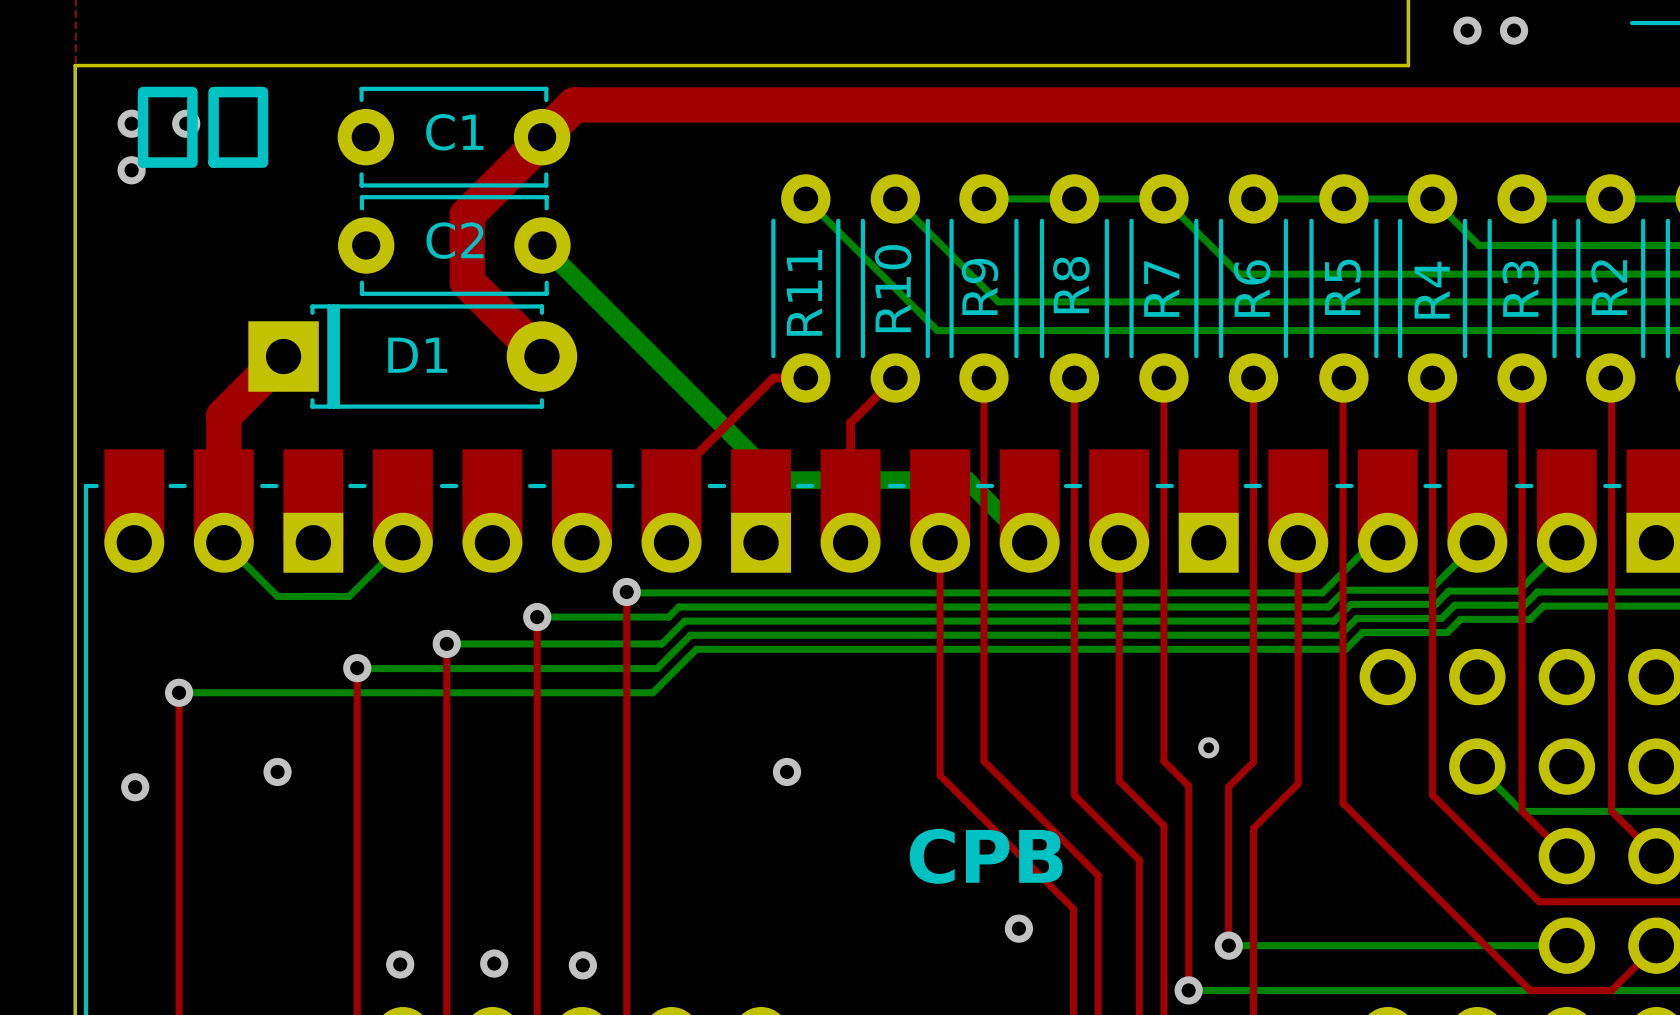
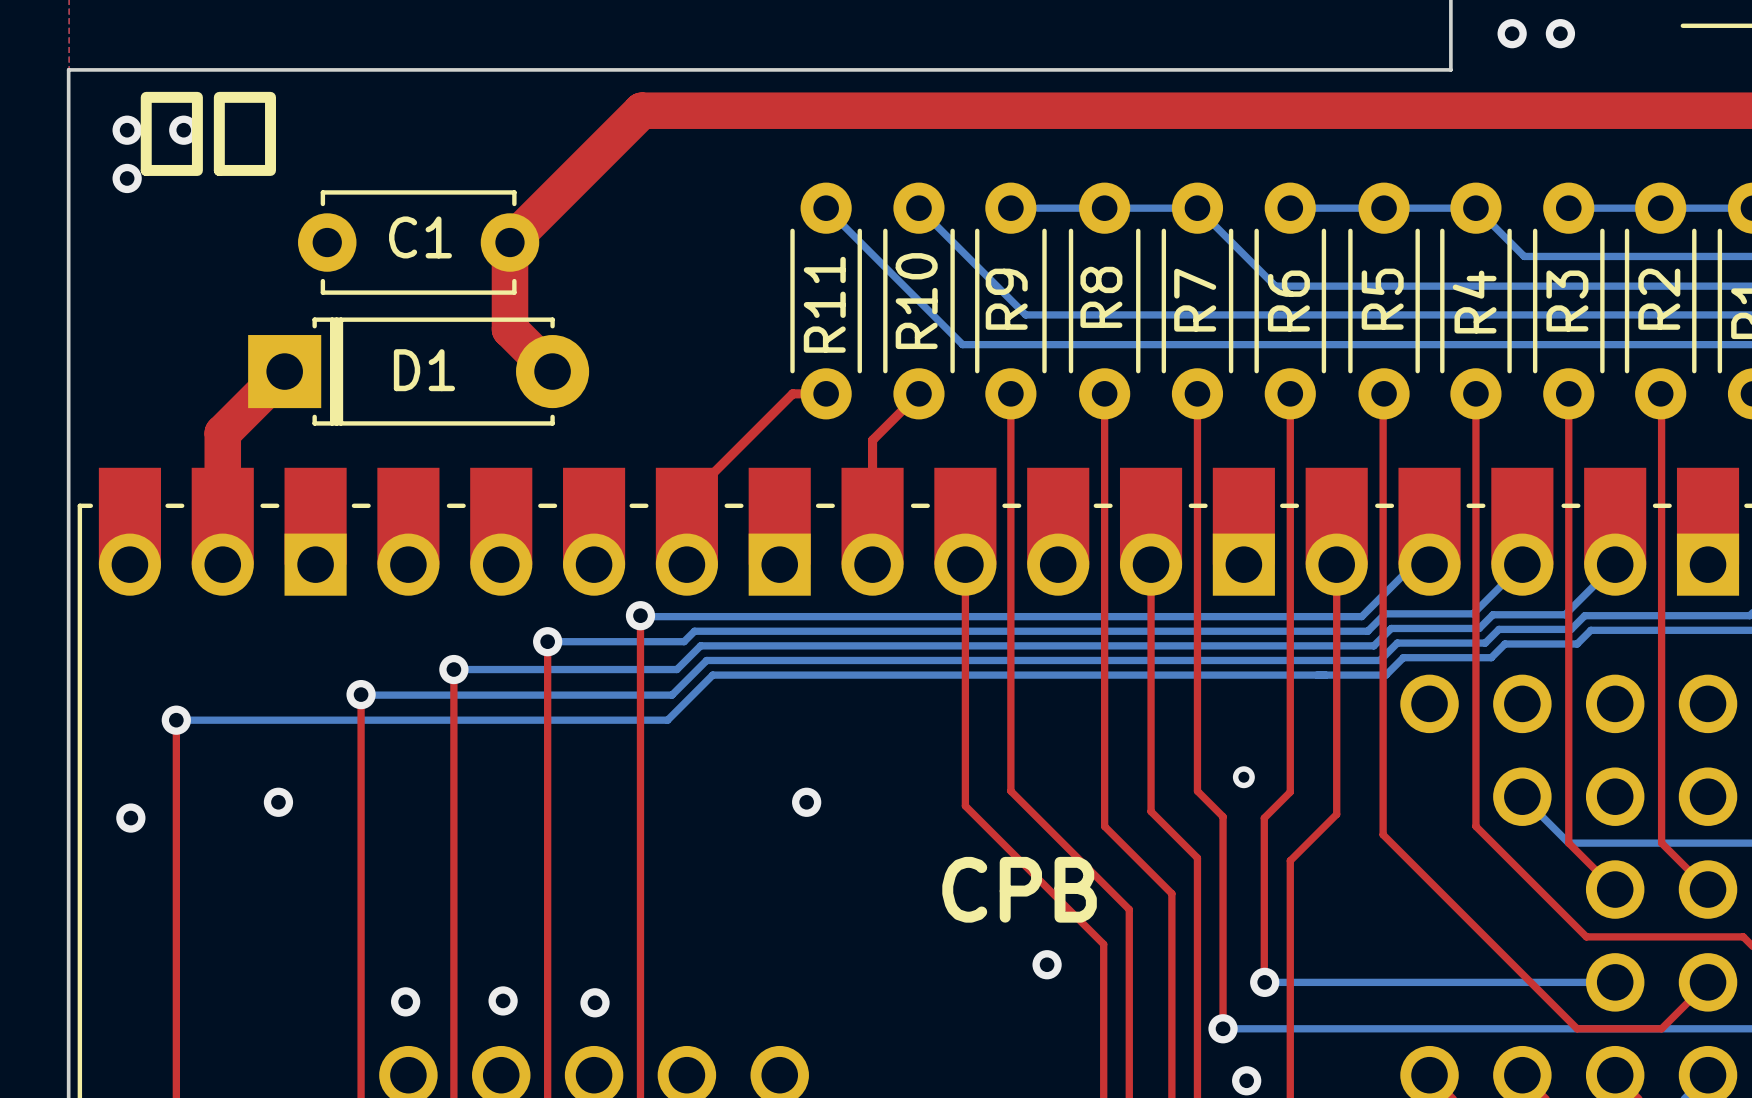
top track: (628, 104) (574, 104) (542, 137) (542, 140) (467, 215) (467, 281) (541, 356) -> (641, 110) (509, 242) (509, 329) (552, 371)
C1 position: (453, 137) -> (418, 242)
C2: (454, 245) -> none
bottom track: (542, 245) (777, 480) (966, 480) (1029, 542) -> none
bottom track: (223, 542) (277, 596) (349, 596) (402, 542) -> none

